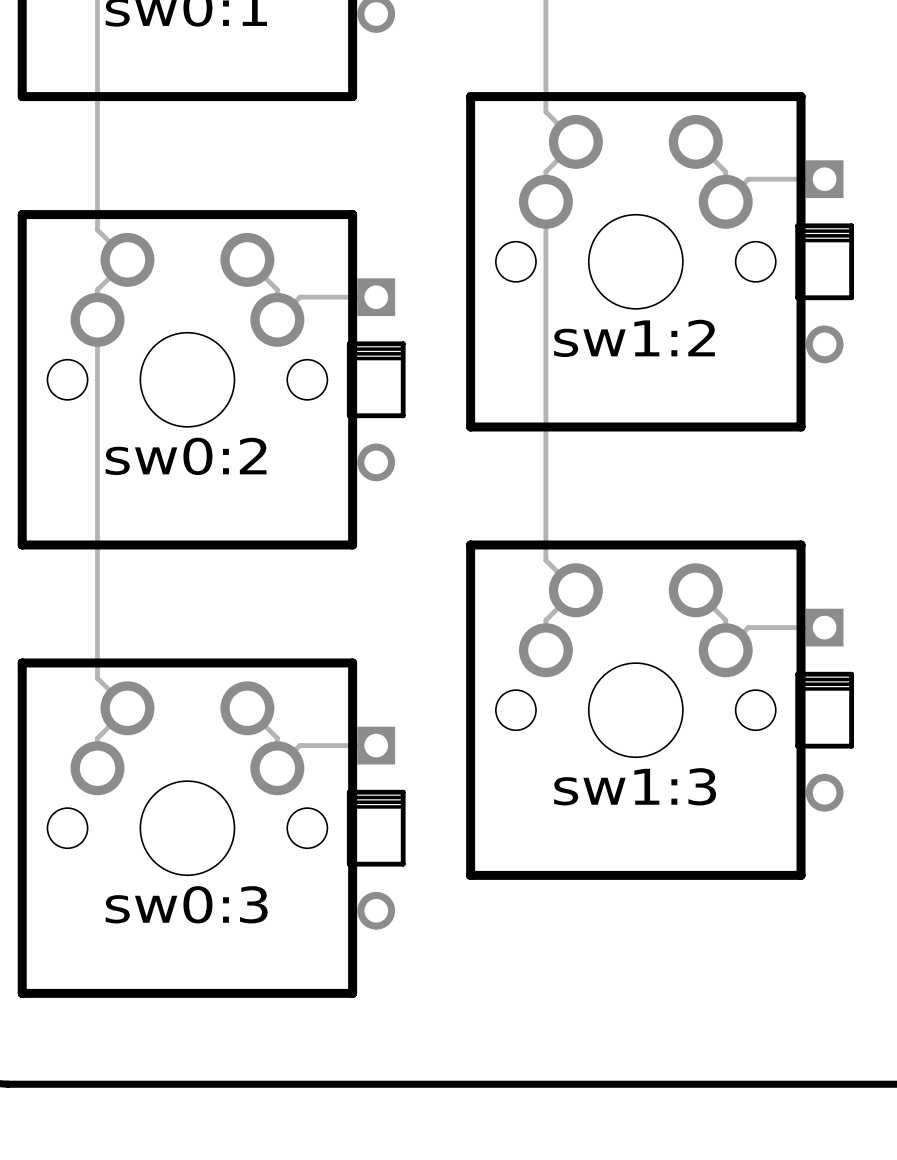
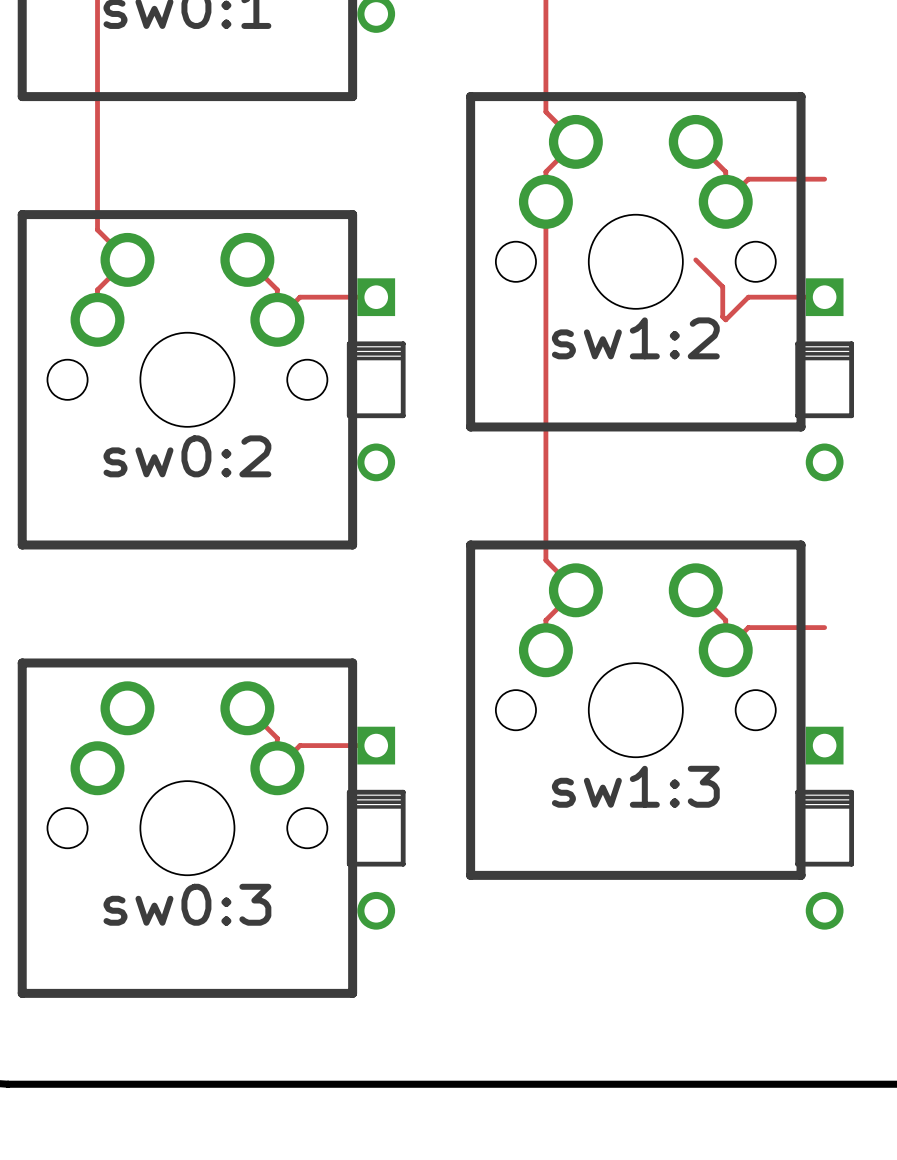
track: none -> (695, 259) (722, 286) (722, 316) (725, 319) (748, 297) (824, 297)
part position: (824, 261) -> (824, 379)
track: (97, 319) (97, 678) (127, 708) (97, 738) (97, 768) -> none
part position: (824, 710) -> (824, 828)

